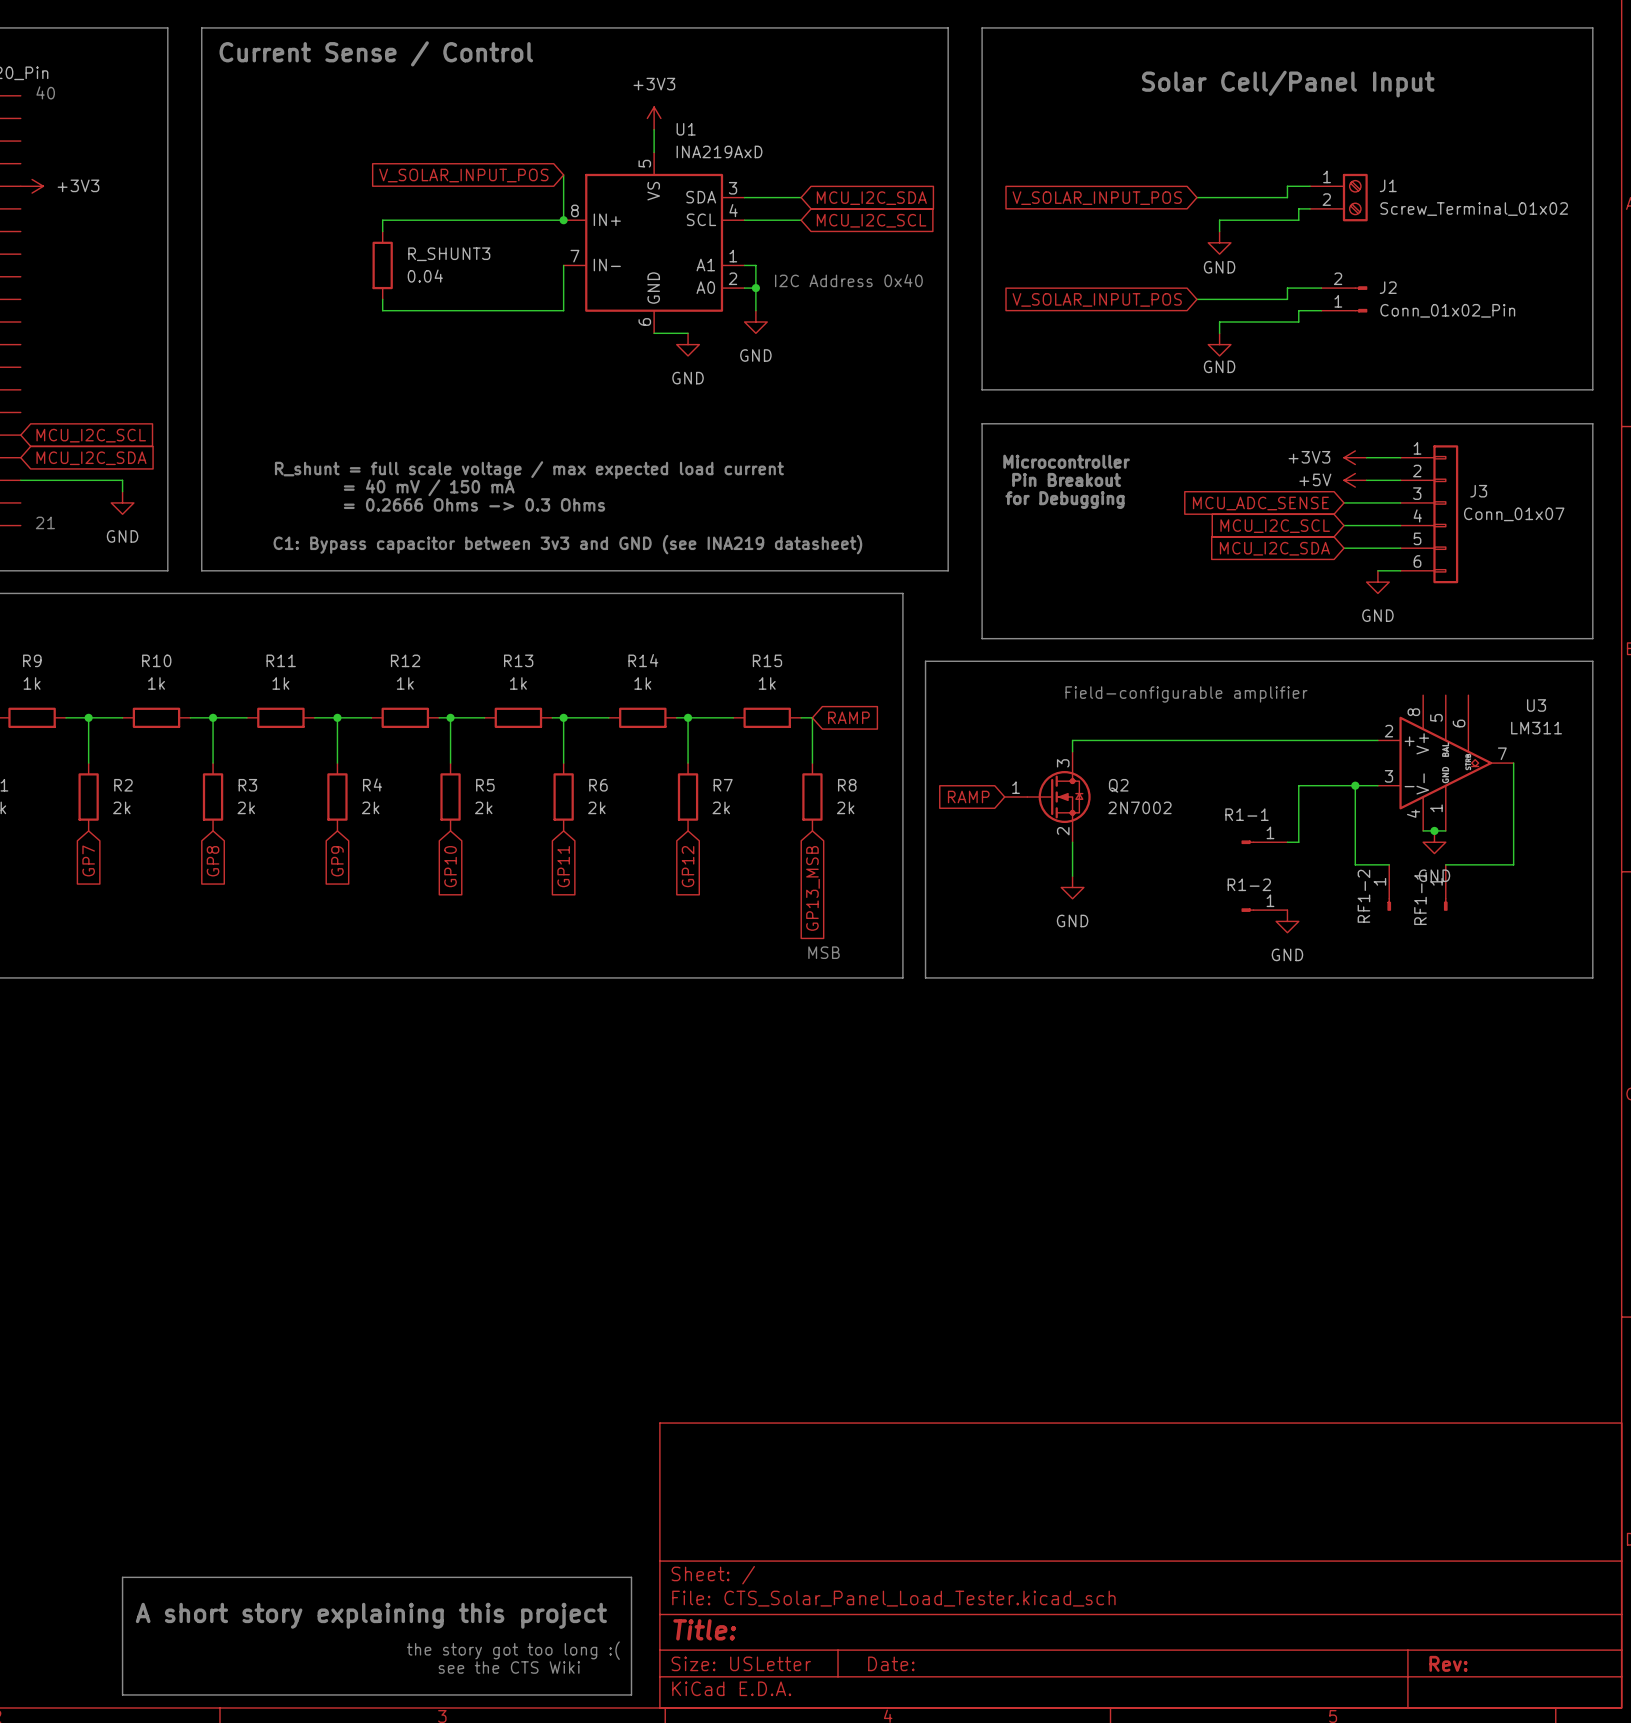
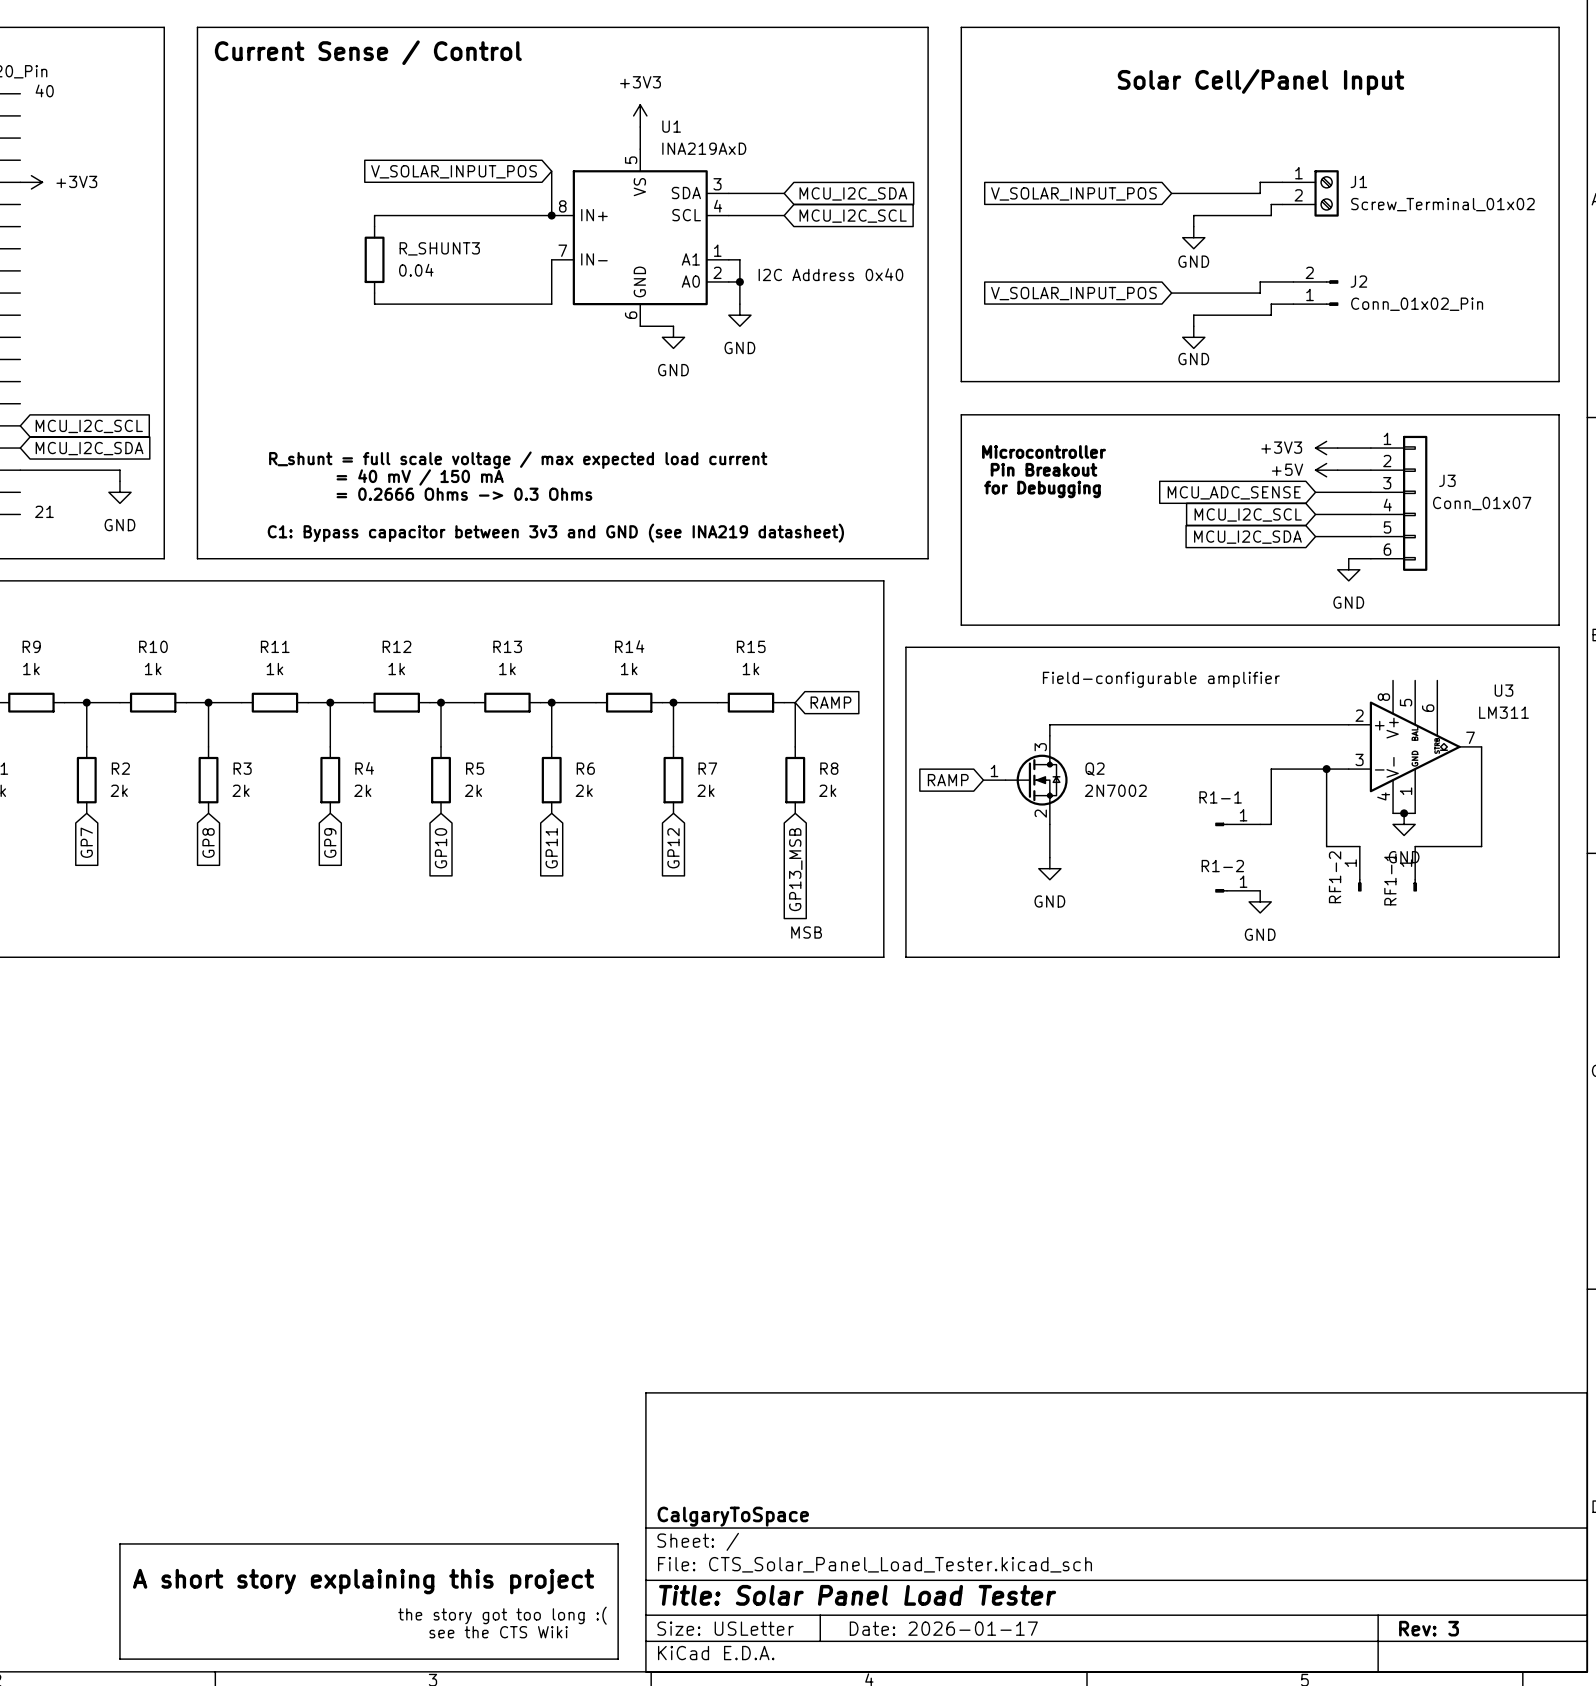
title block: none -> CalgaryToSpace (733, 1516)
title block: Title: (704, 1629) -> Title: Solar Panel Load Tester (857, 1595)
title block: Date: (891, 1663) -> Date: 2026-01-17 (943, 1628)
title block: Rev: (1448, 1663) -> Rev: 3 (1429, 1628)

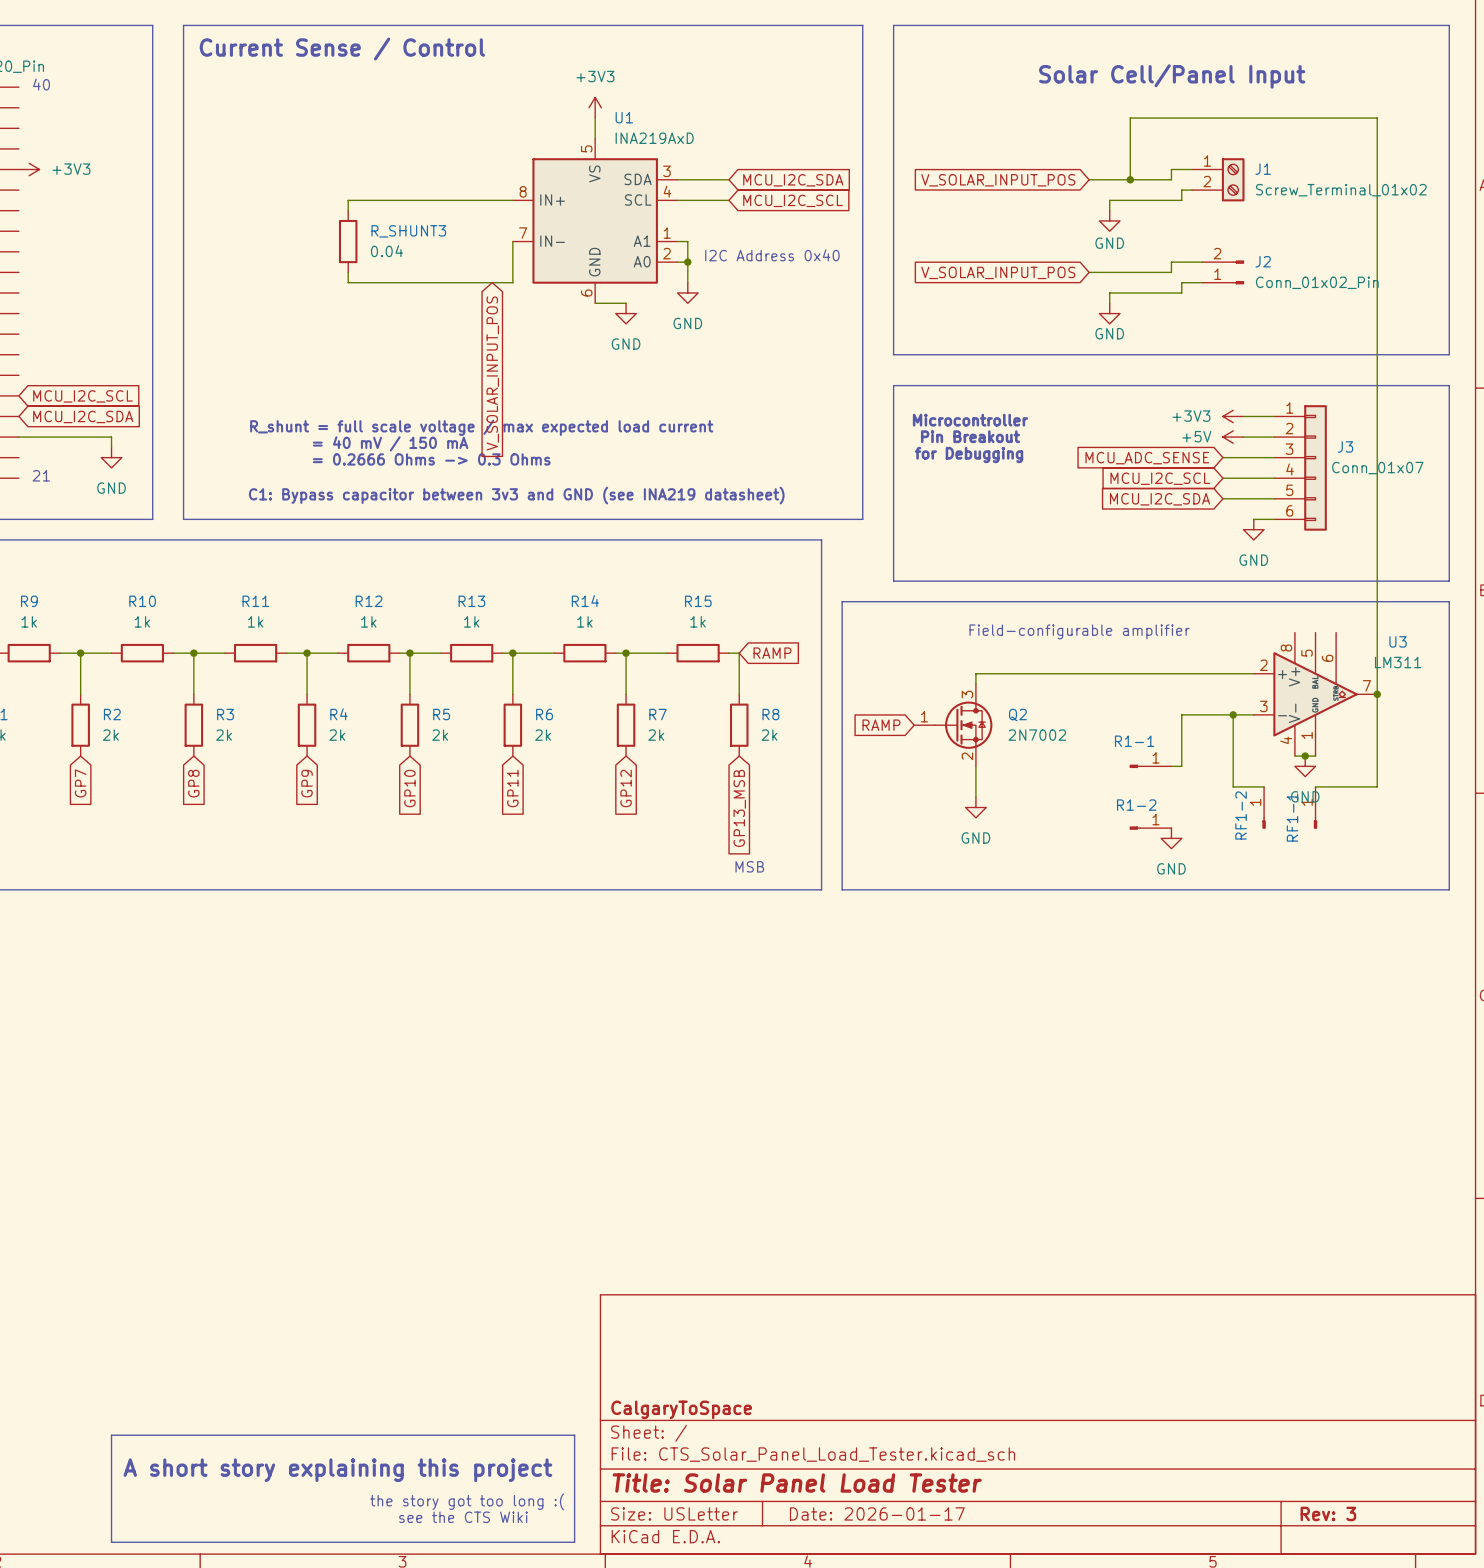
global label rotation: 0° (454, 171) -> 90° counterclockwise (492, 373)
global label position: V_SOLAR_INPUT_POS (454, 171) -> V_SOLAR_INPUT_POS (492, 373)
wire: (551, 171) (551, 215) -> none
wire: none -> (1130, 179) (1130, 118) (1377, 118) (1377, 694)
junction: none -> (1130, 179)
junction: (551, 215) -> none
junction: none -> (1377, 694)

